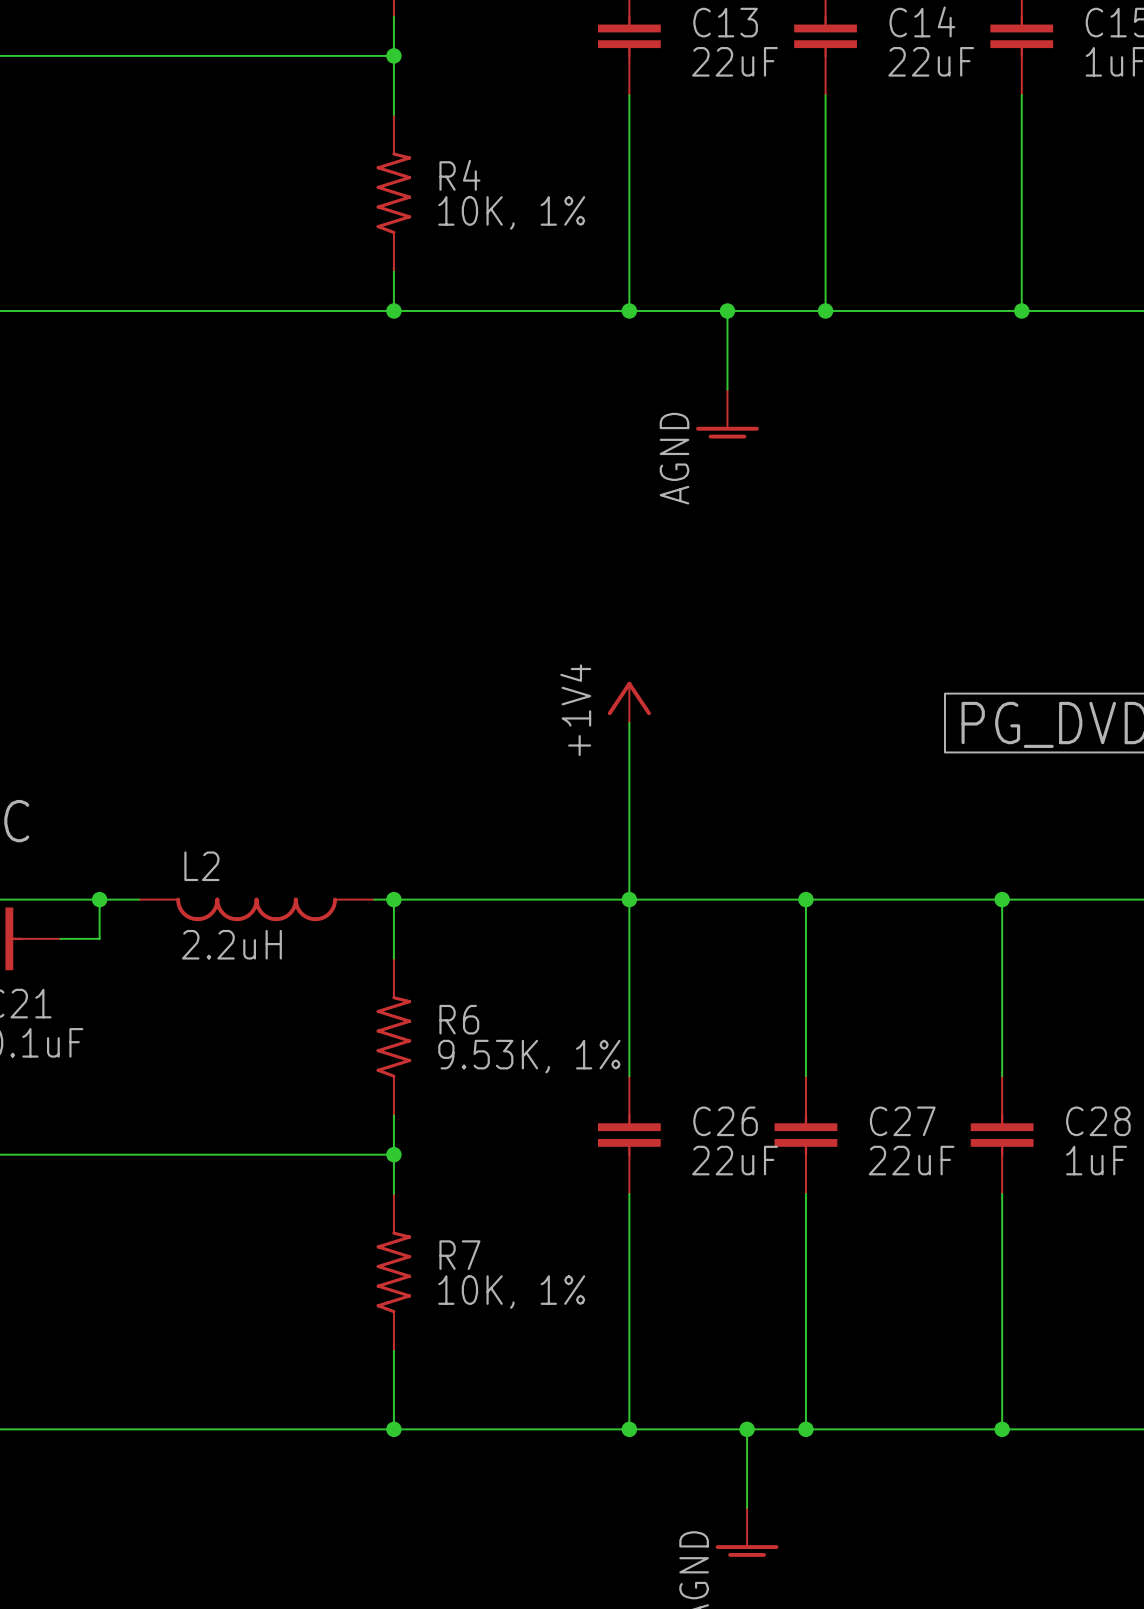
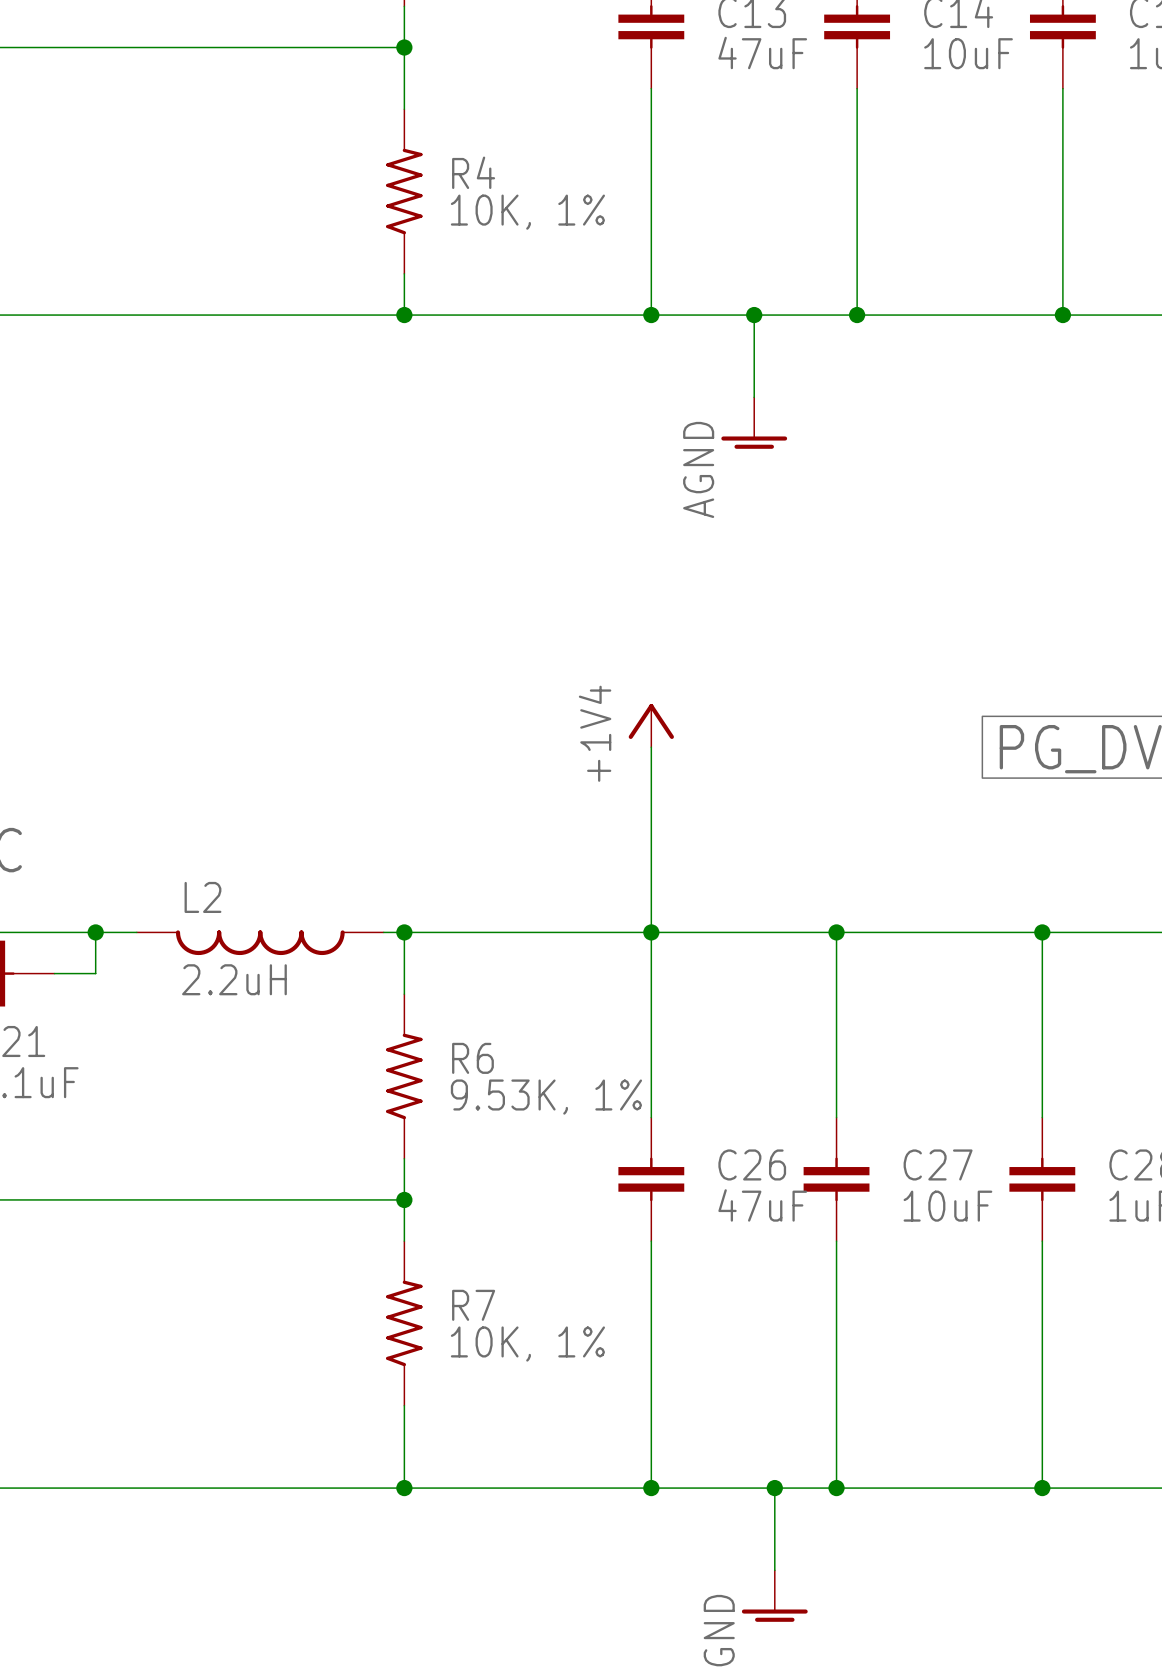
C13 value: 22uF (735, 61) -> 47uF (762, 53)
C14 value: 22uF (931, 61) -> 10uF (968, 53)
C26 value: 22uF (735, 1160) -> 47uF (762, 1205)
C27 value: 22uF (911, 1160) -> 10uF (947, 1206)

